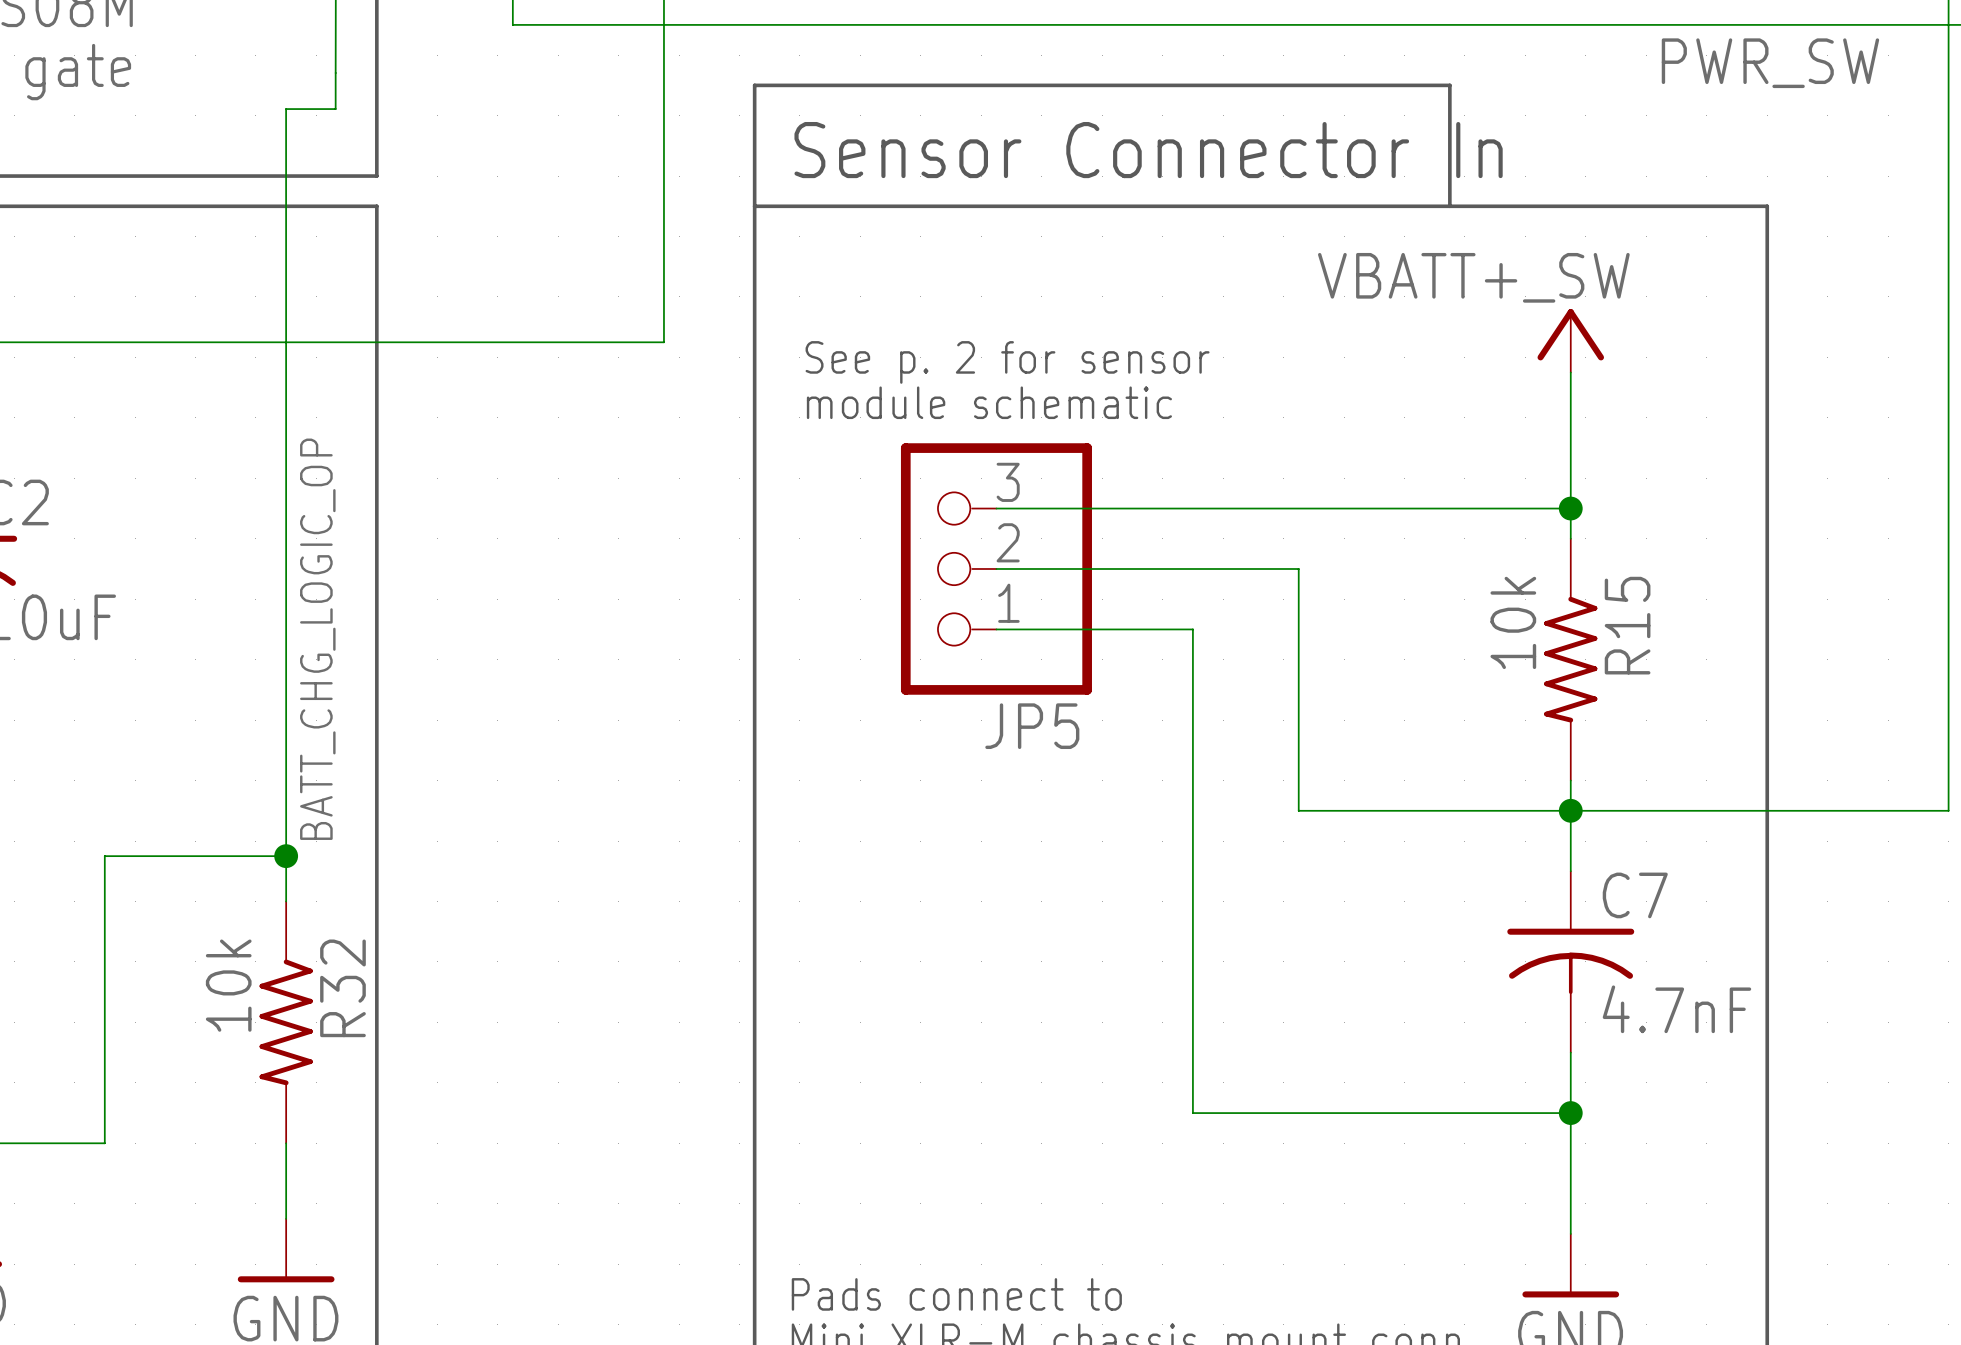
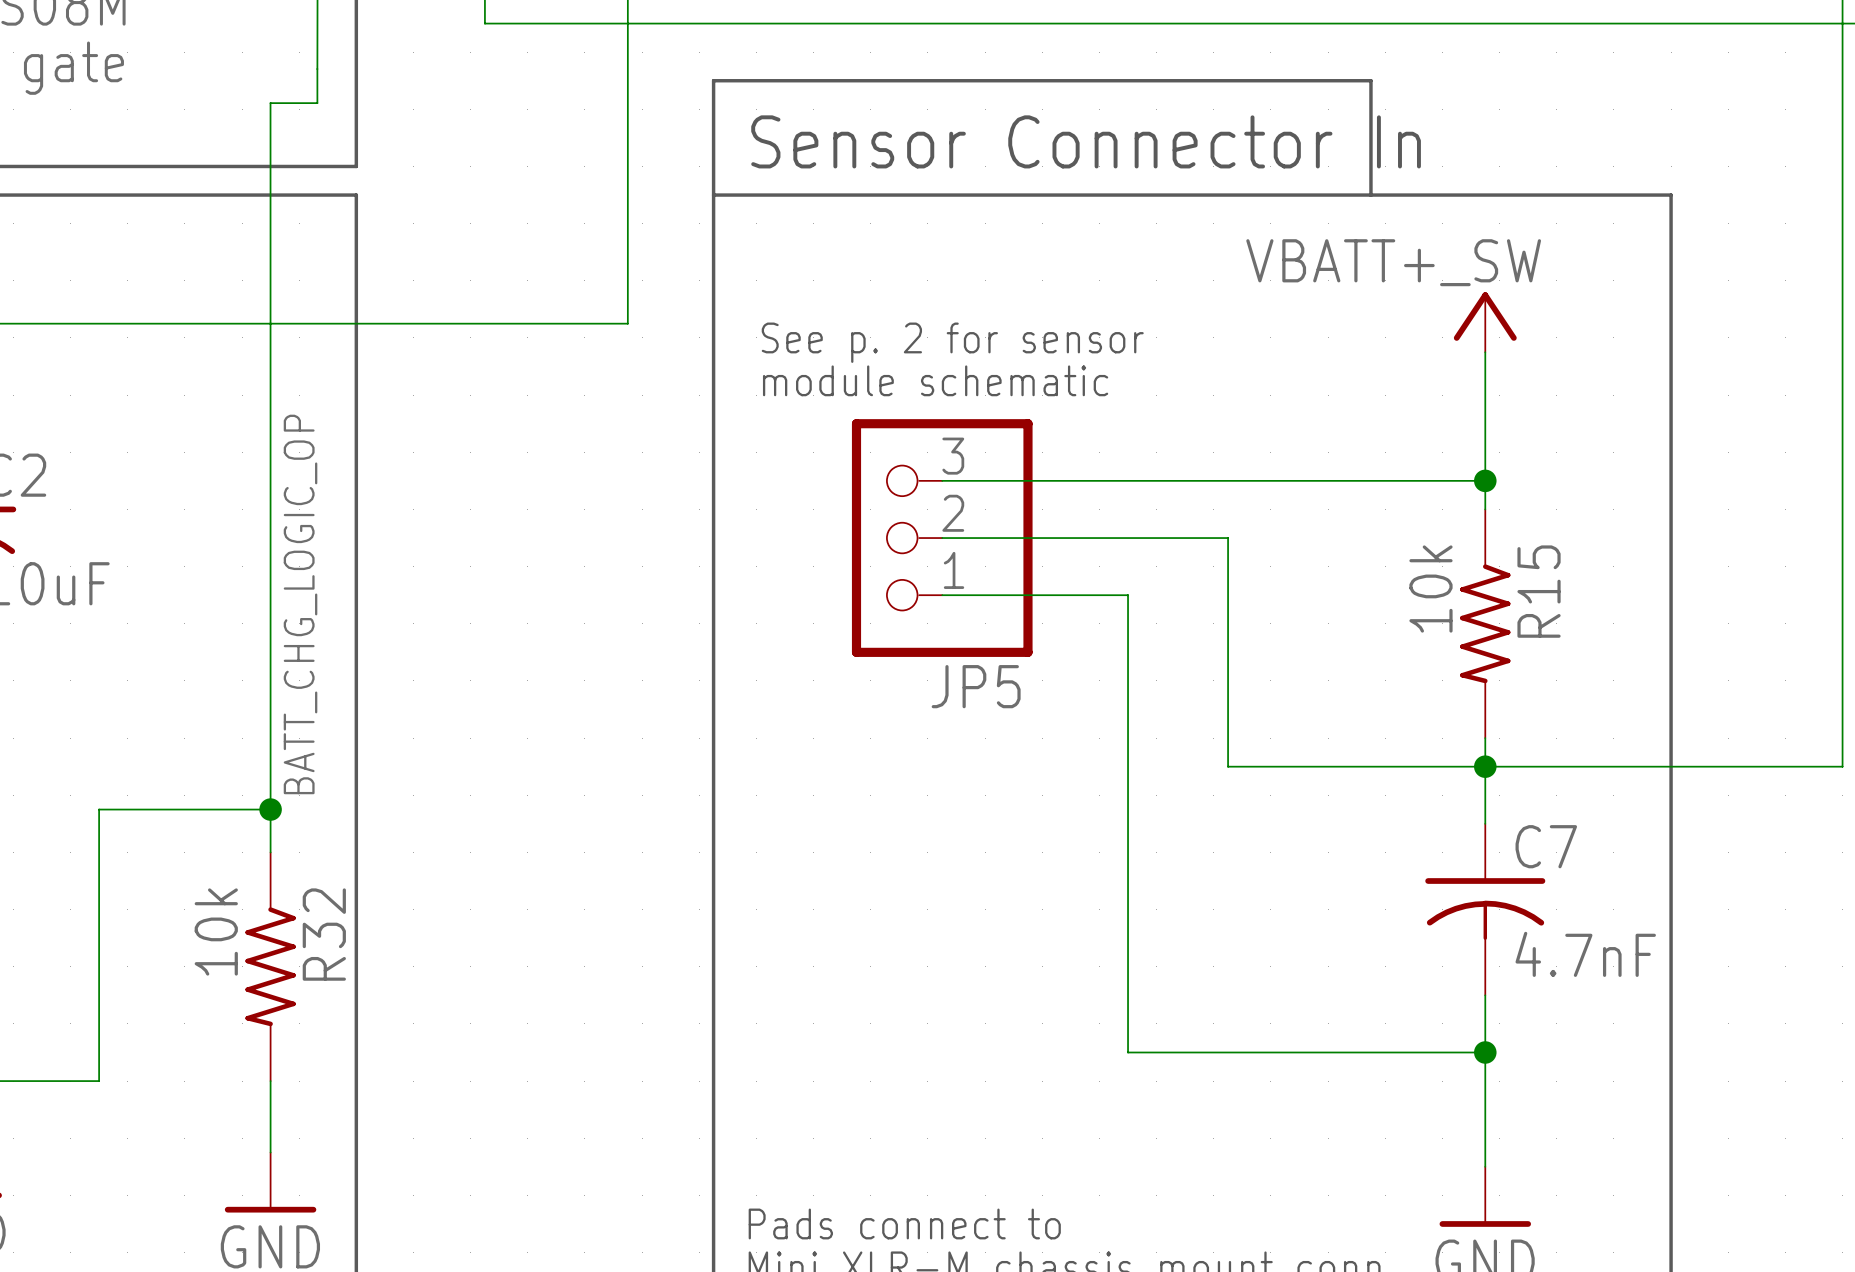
label: PWR_SW (1770, 63) -> none

